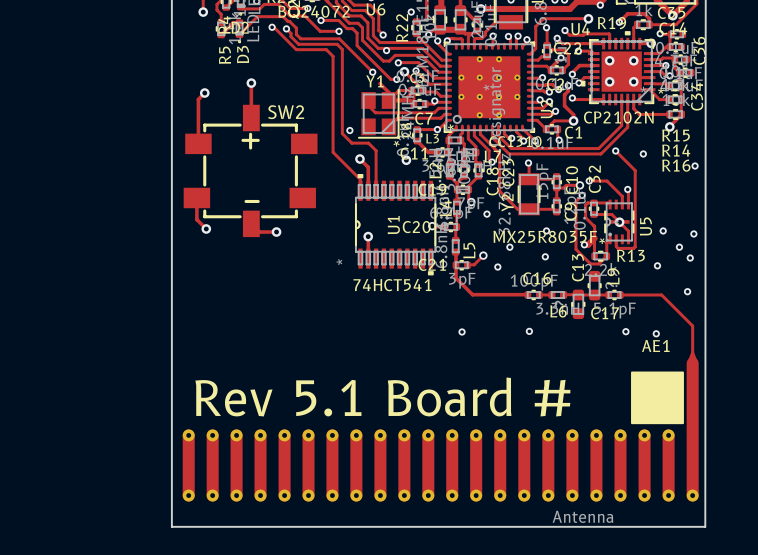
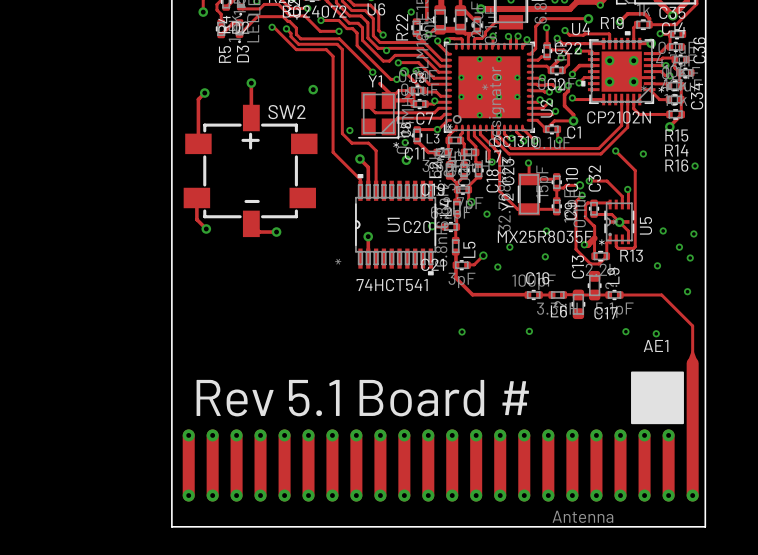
via: none -> (313, 89)
via: none -> (405, 142)

